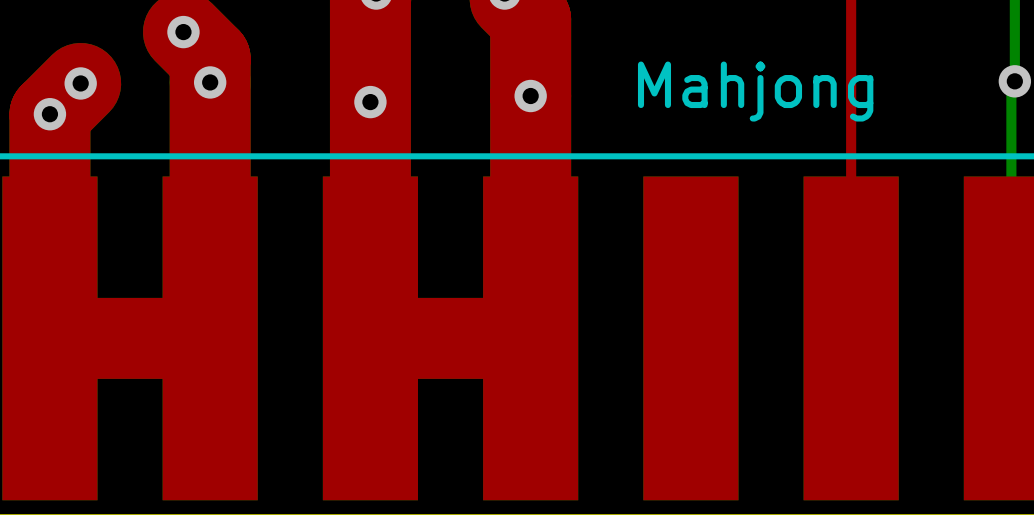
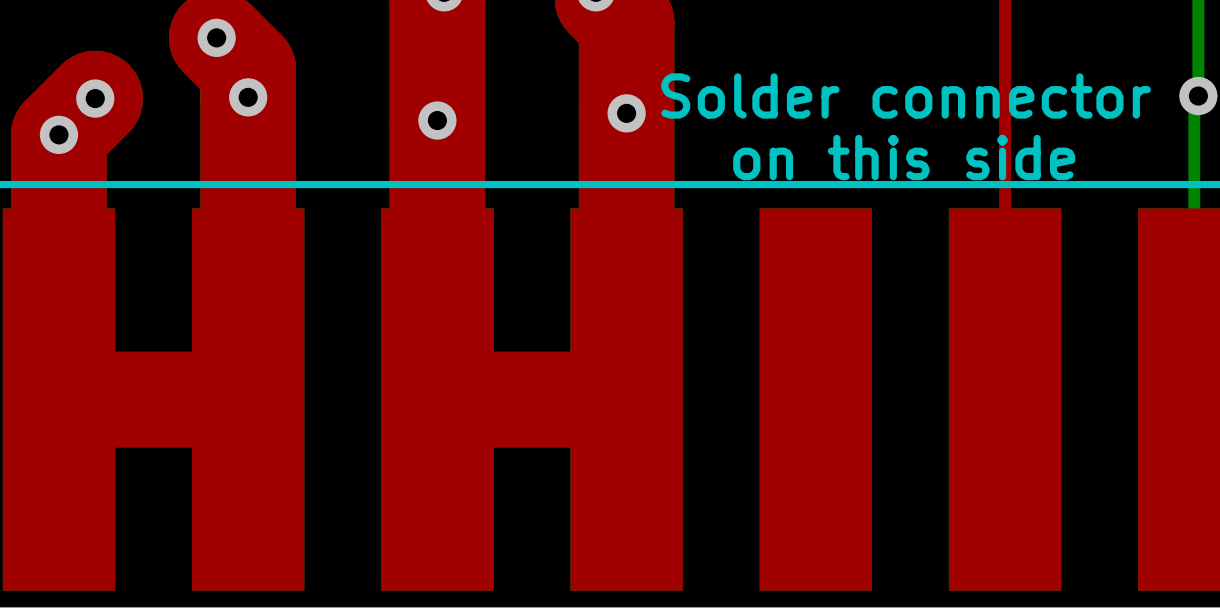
text: Mahjong (755, 91) -> Solder connector (906, 95)
text: none -> on this side (904, 157)

